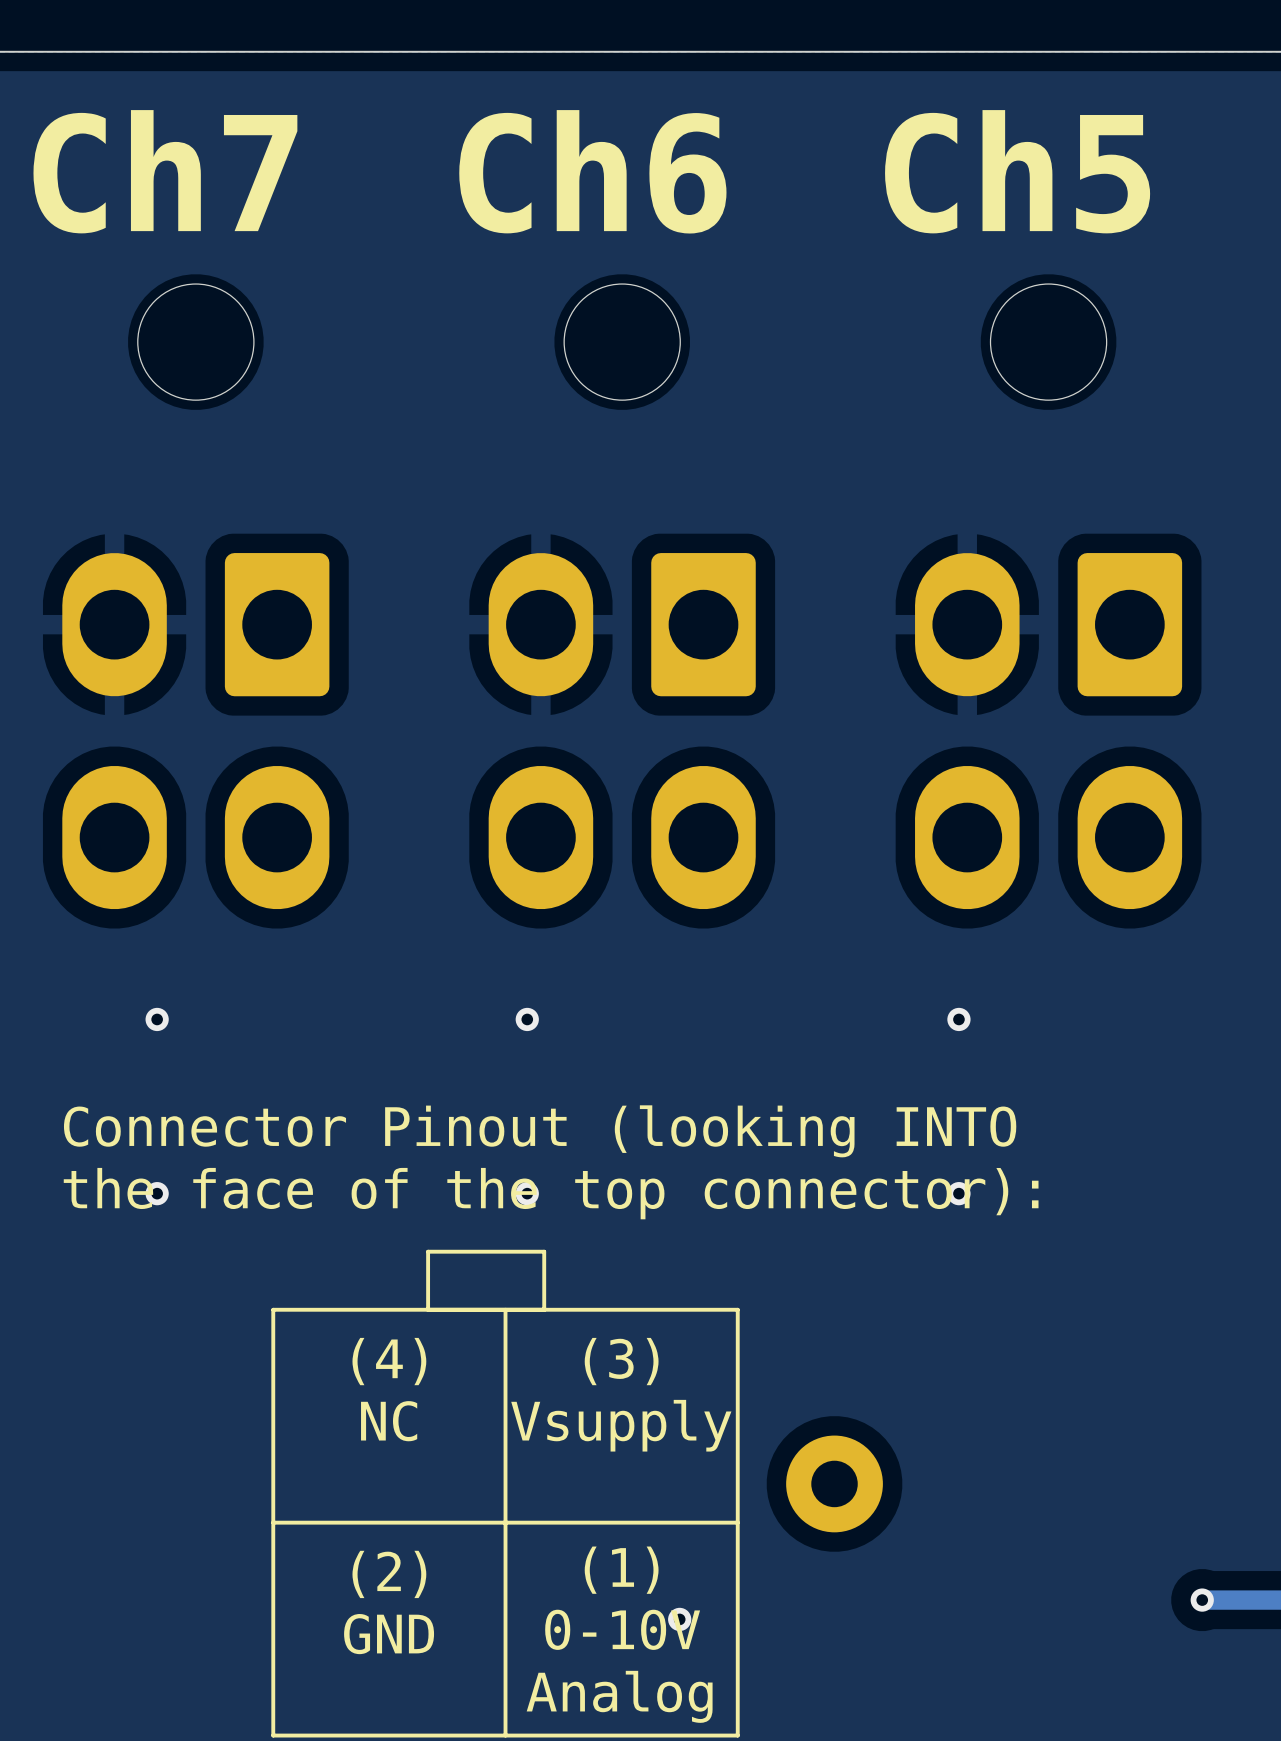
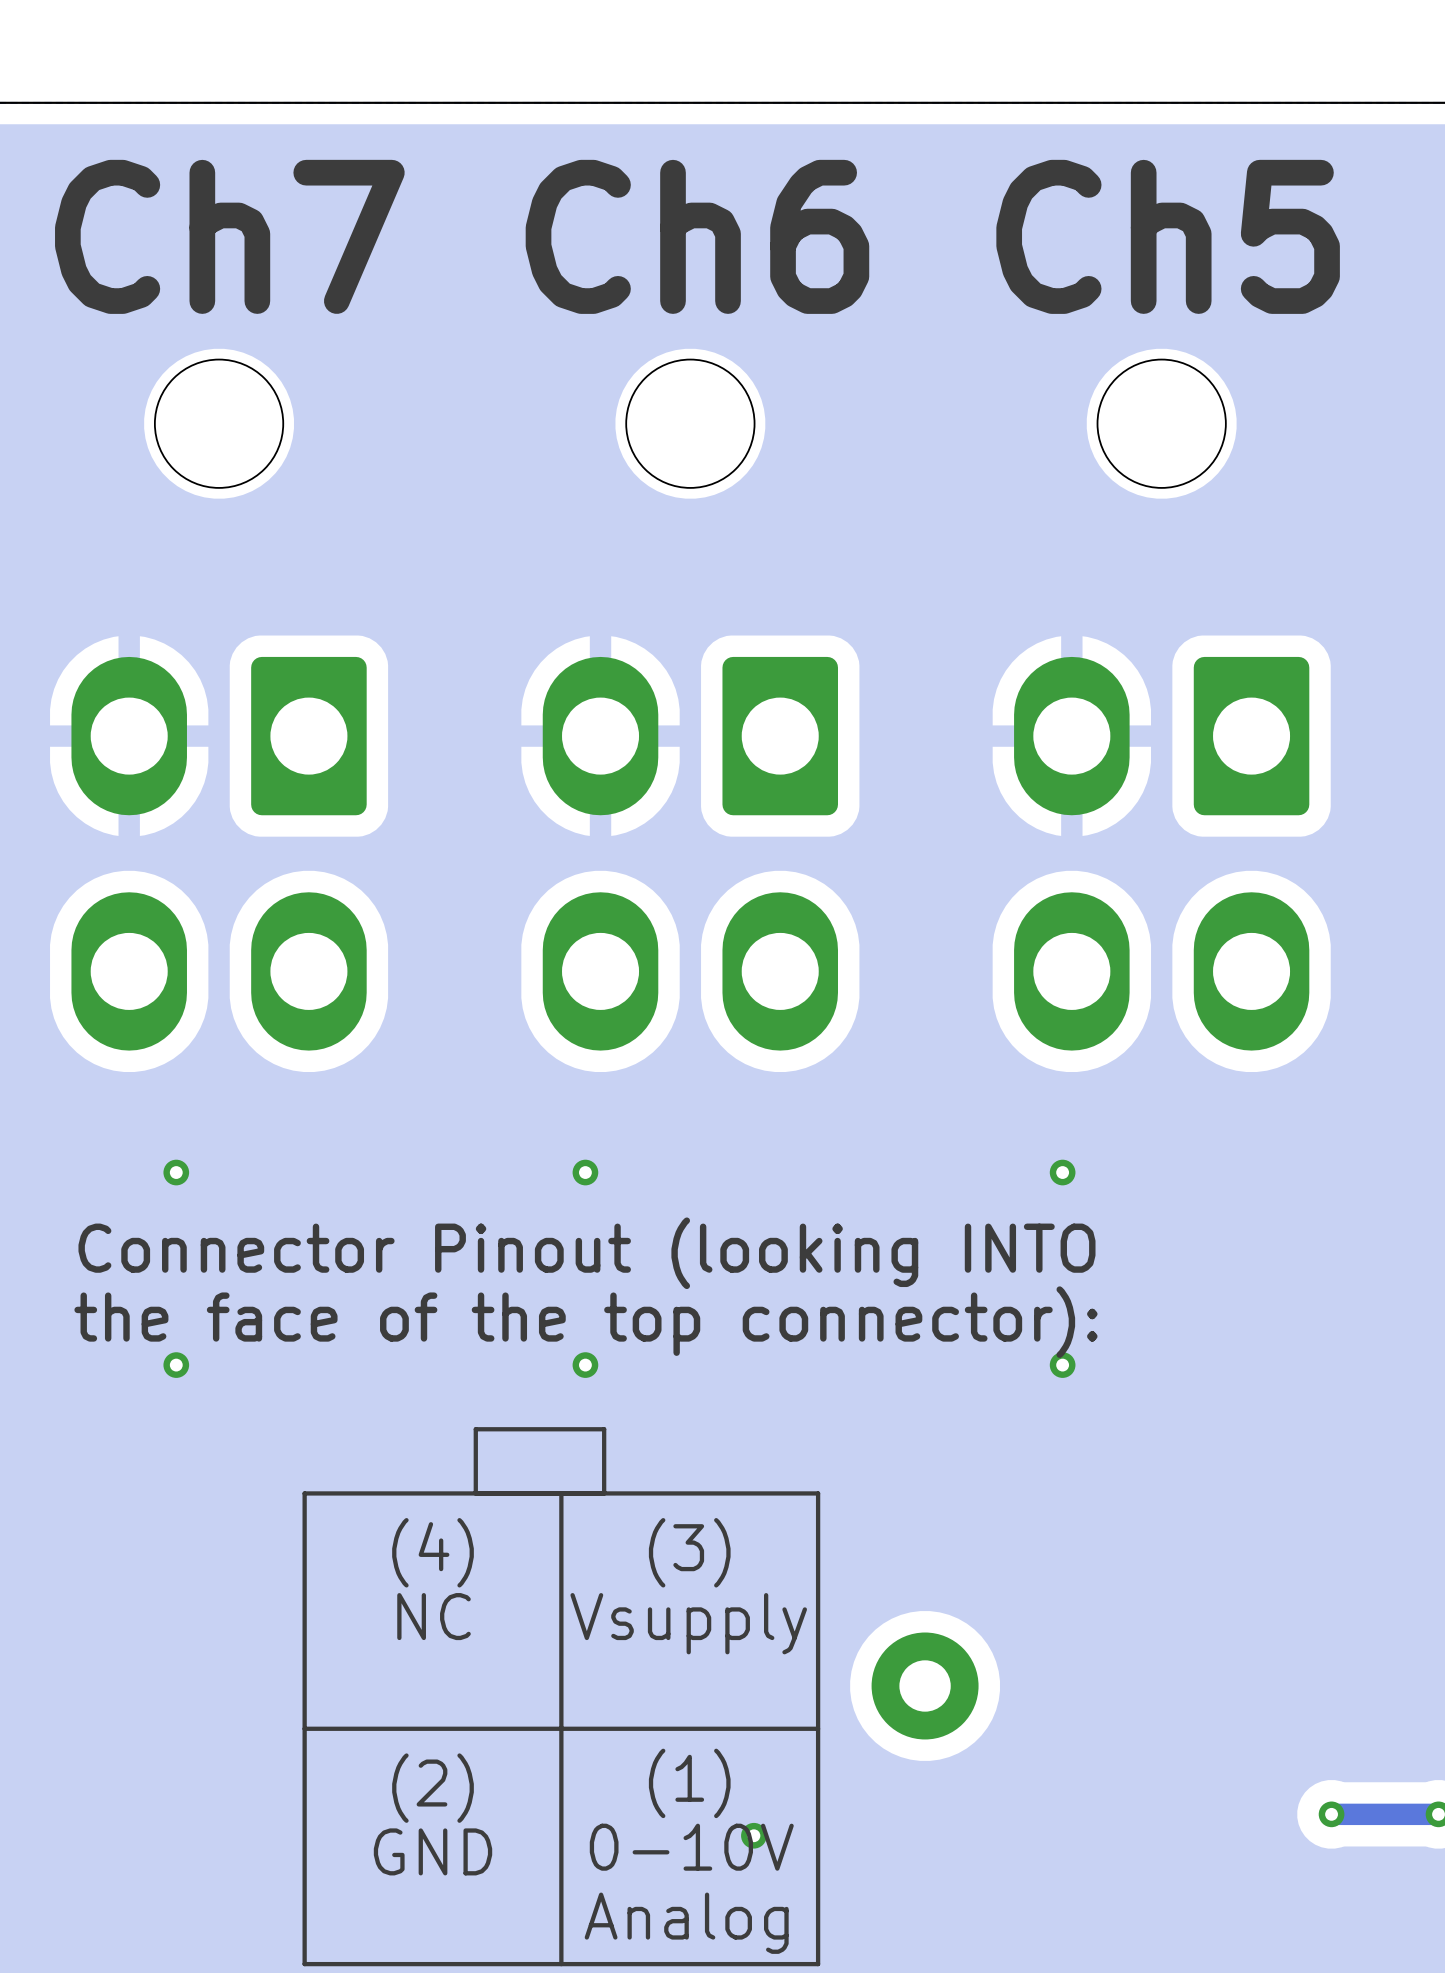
text position: Connector Pinout (looking INTO (540, 1131) -> Connector Pinout (looking INTO (586, 1253)
text position: the face of the top connector): (551, 1193) -> the face of the top connector): (585, 1322)

